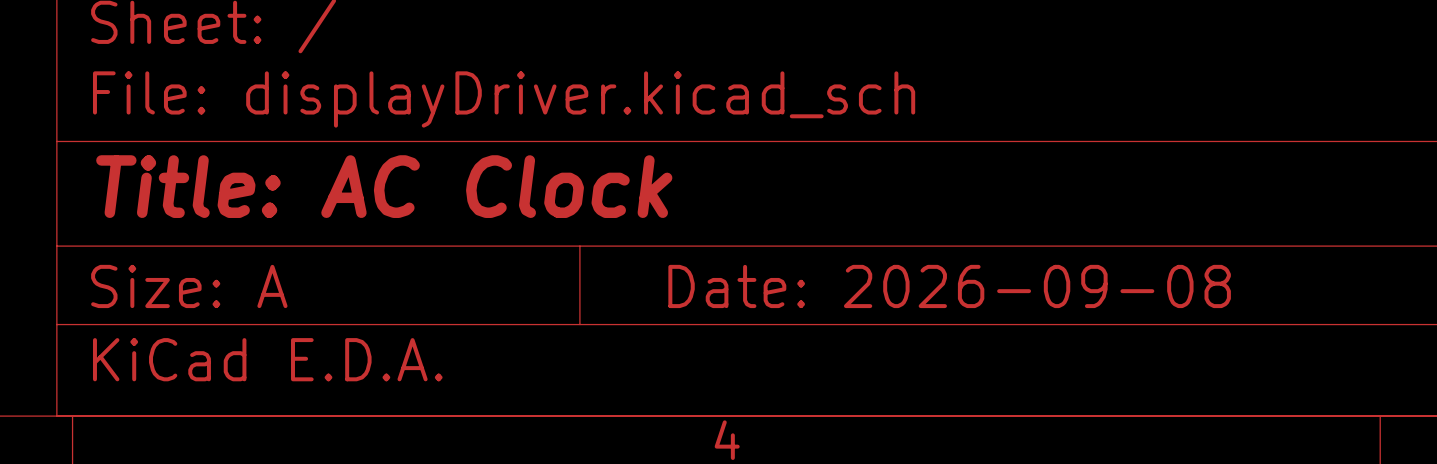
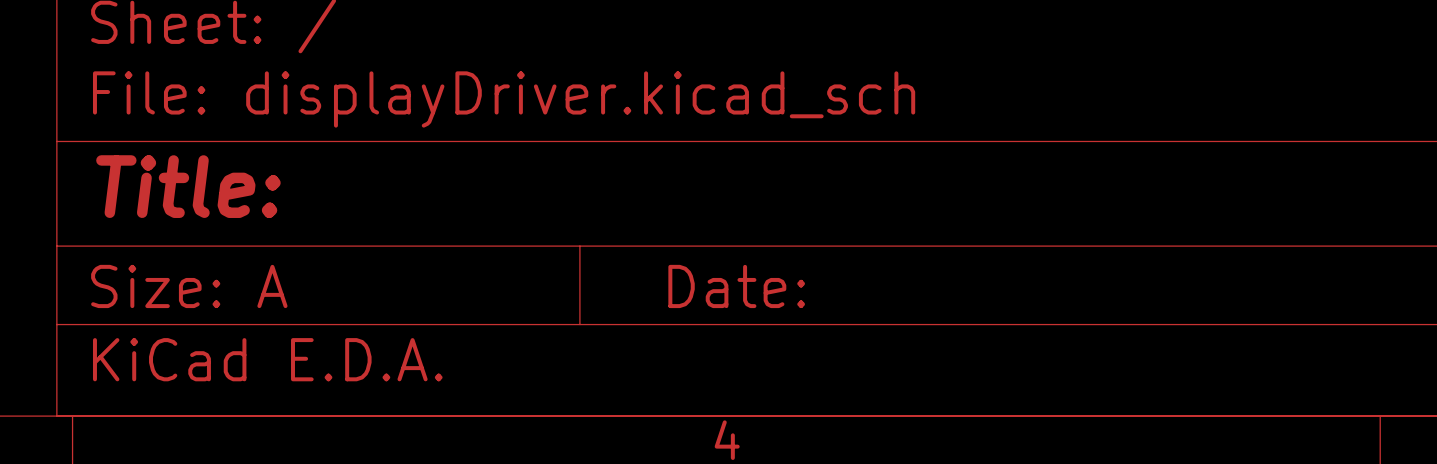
title block: Title: AC Clock (384, 186) -> Title: (188, 186)
title block: Date: 2026-09-08 (949, 286) -> Date: (736, 286)

